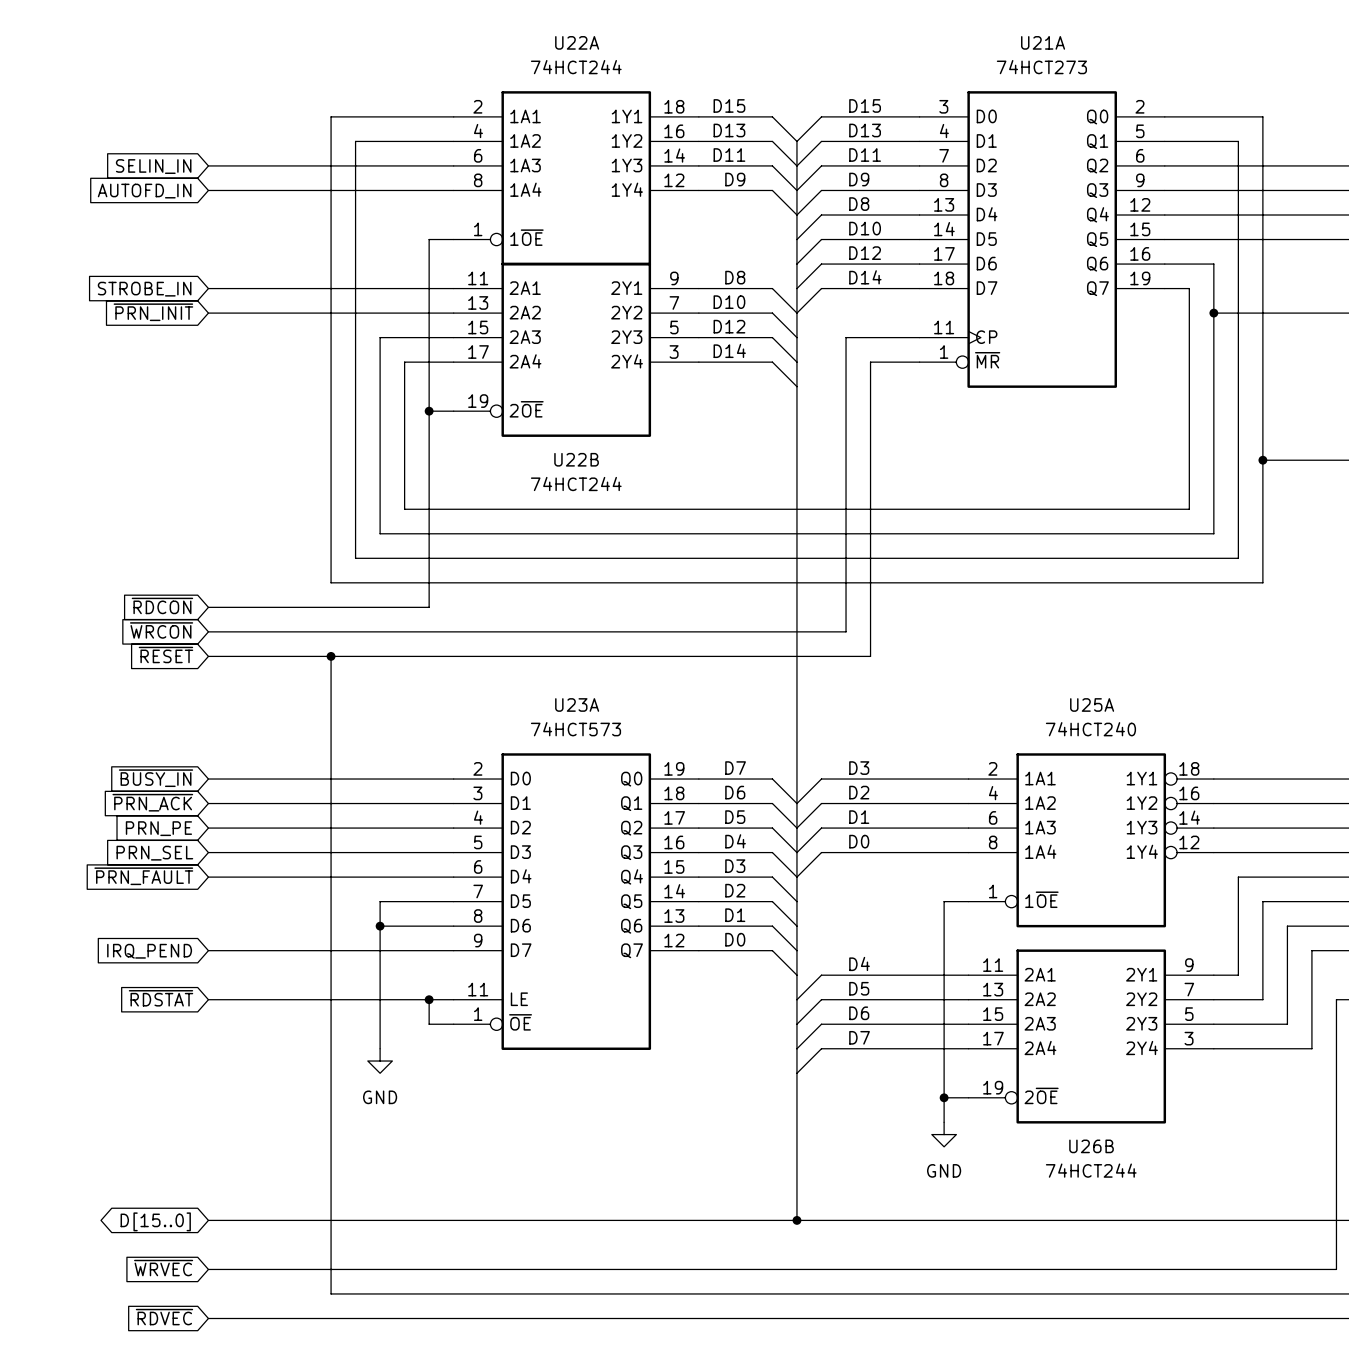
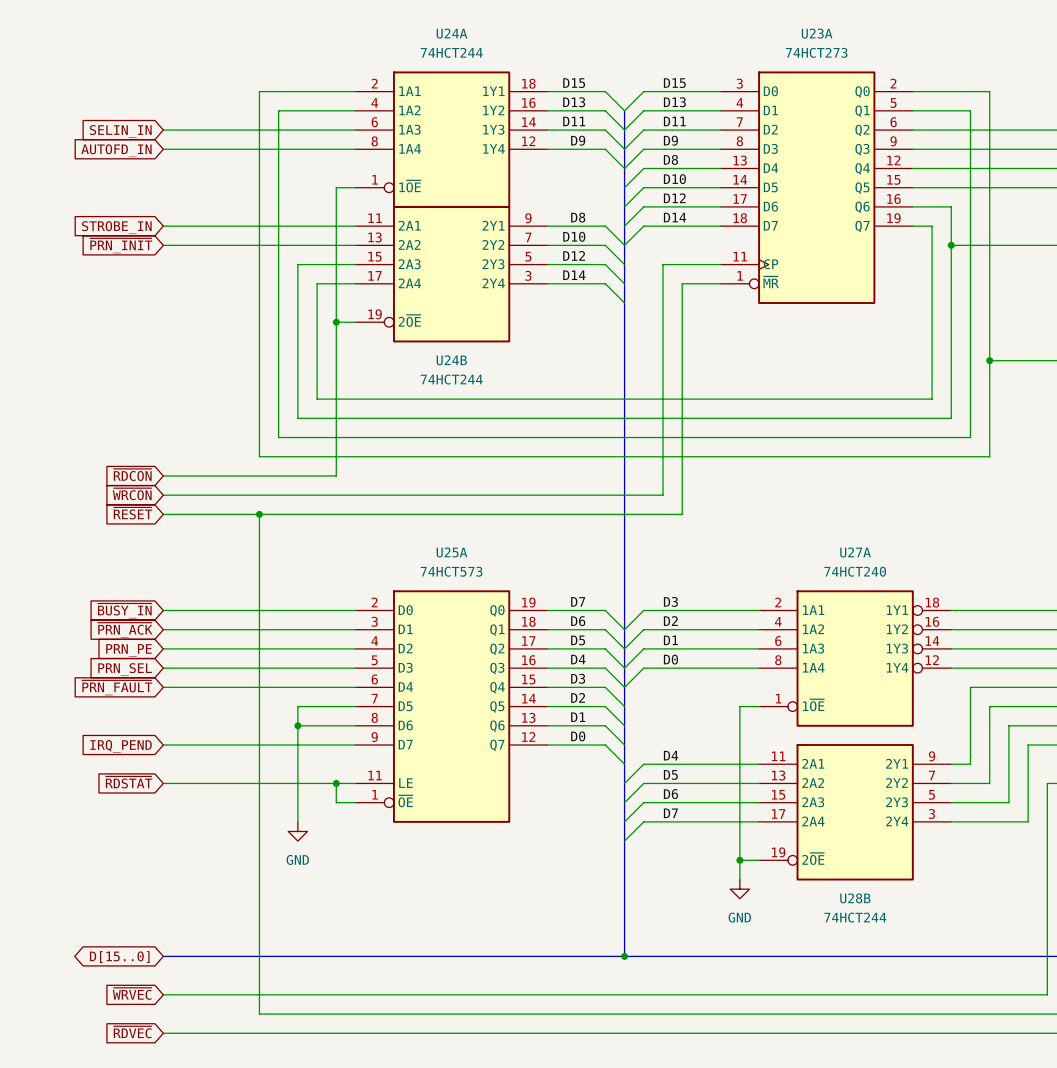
U22A name: U22A (577, 42) -> U24A (451, 33)
U21A name: U21A (1043, 42) -> U23A (817, 33)
U22B name: U22B (576, 459) -> U24B (451, 360)
U23A name: U23A (577, 704) -> U25A (451, 552)
U25A name: U25A (1092, 704) -> U27A (855, 552)
U26B name: U26B (1091, 1146) -> U28B (855, 898)

